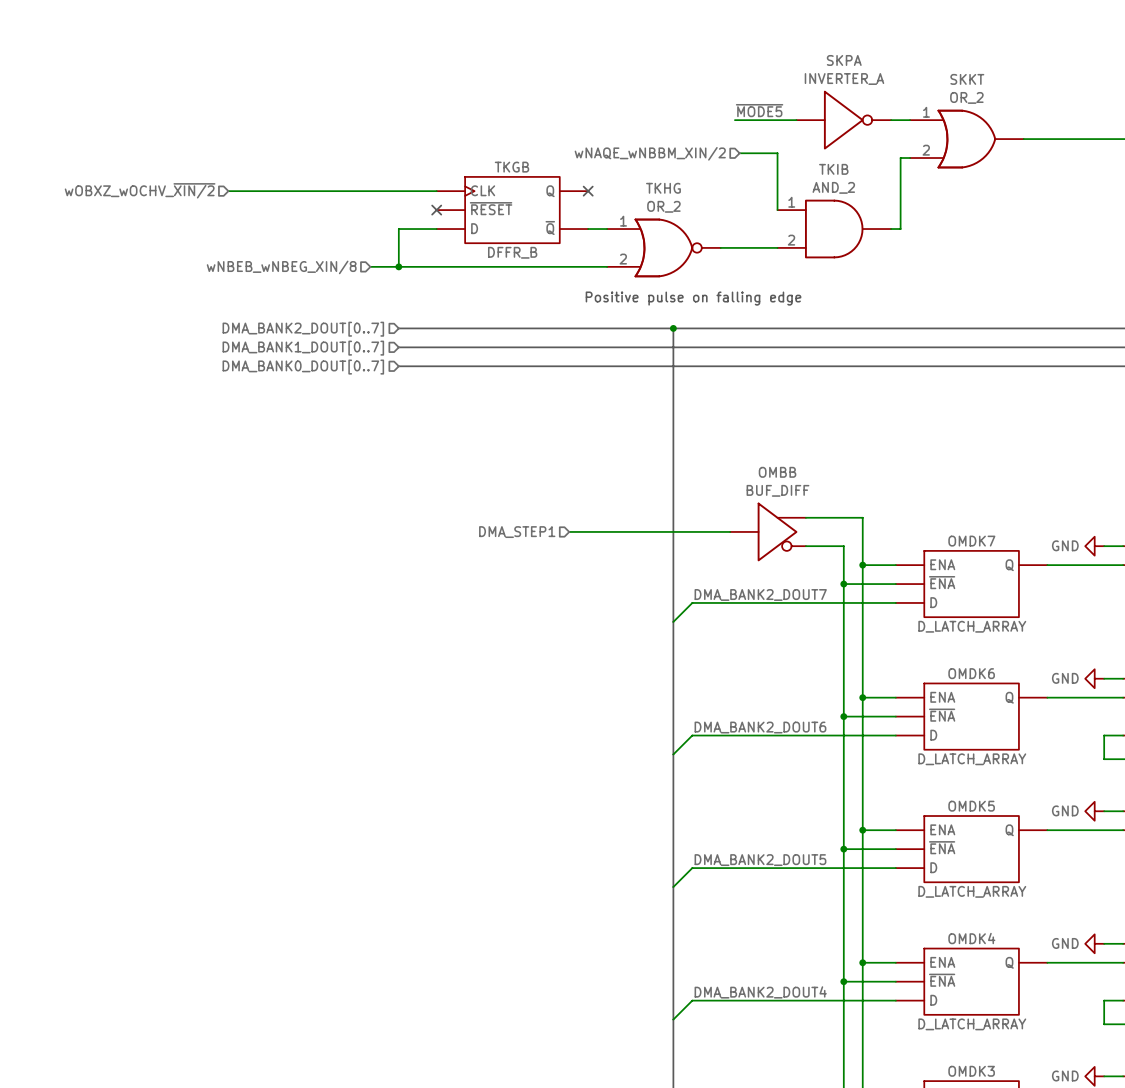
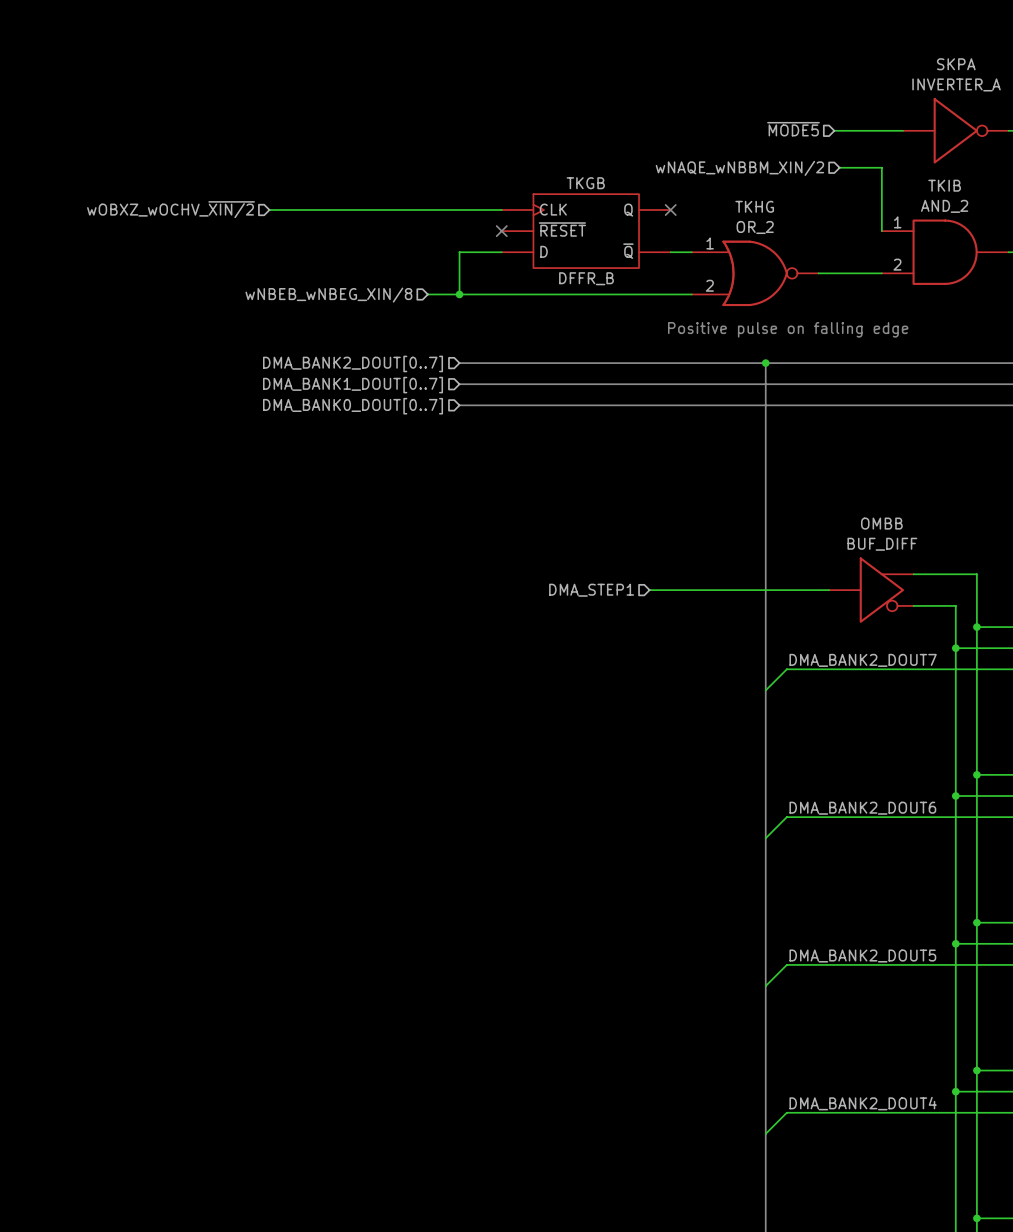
label: ~{MODE5} (759, 110) -> none
hierarchical label: none -> ~{MODE5} (793, 129)

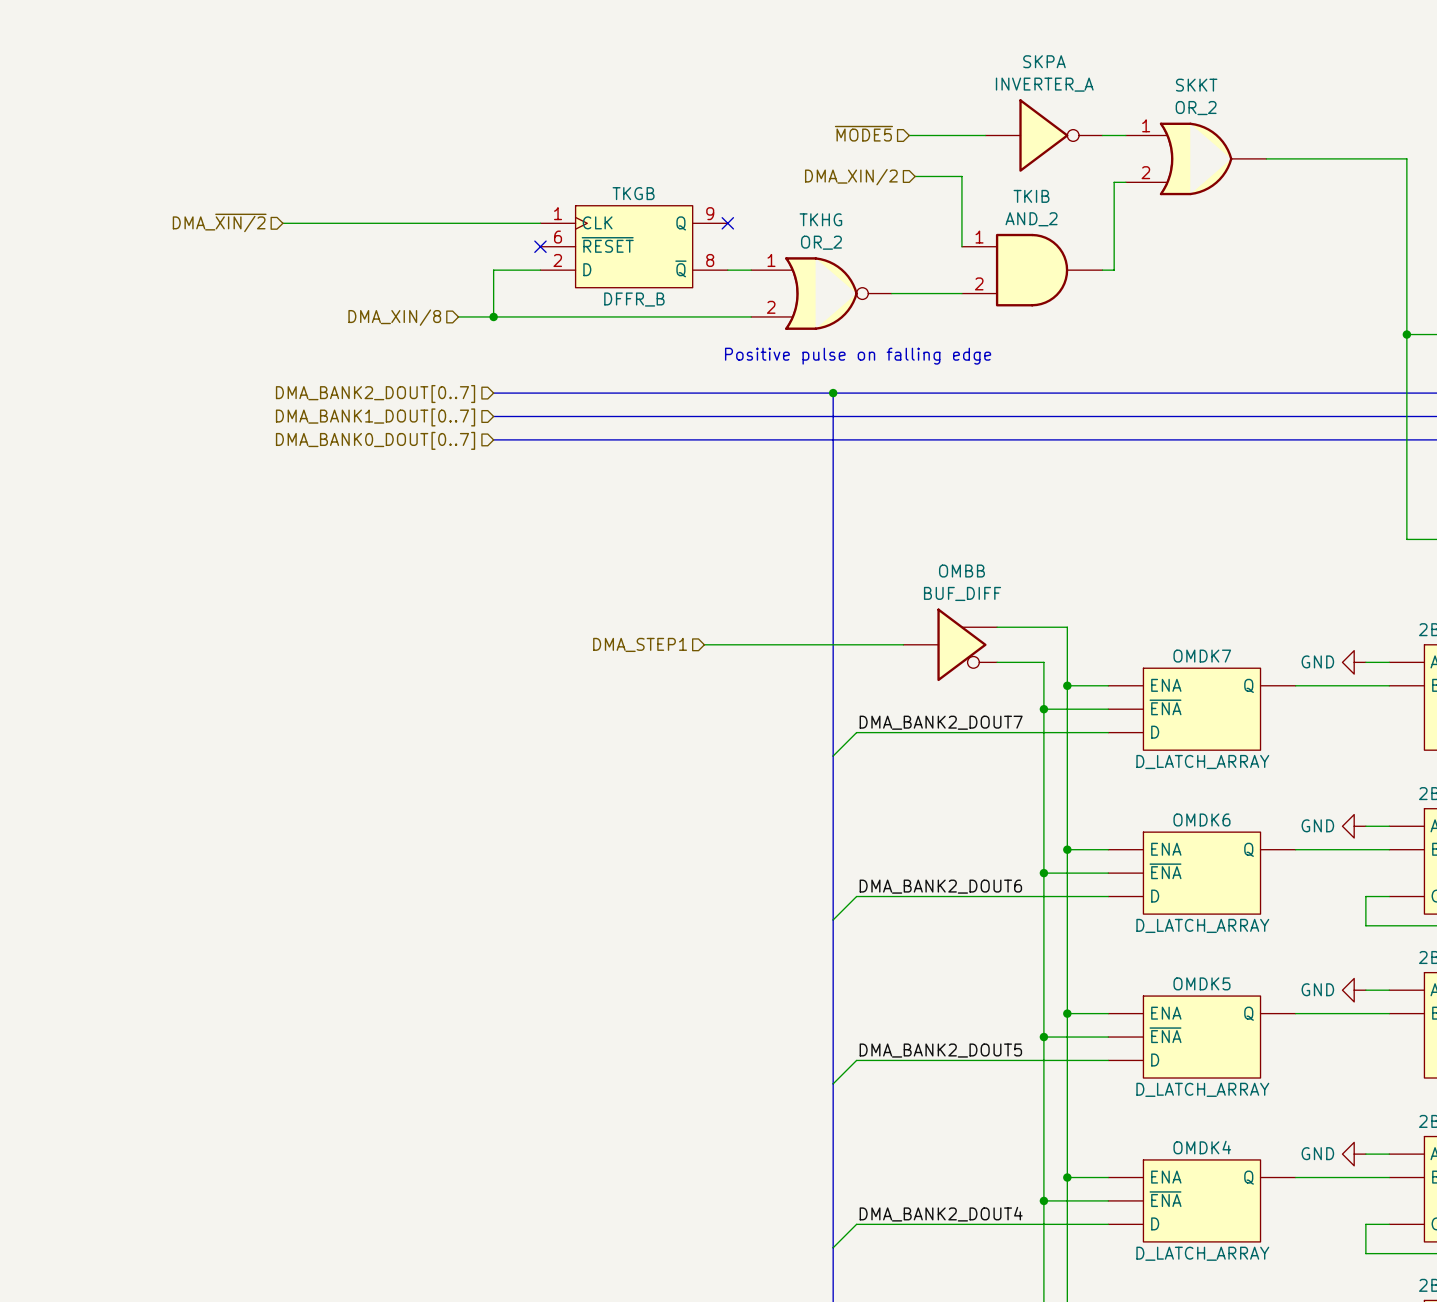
hierarchical label: wNAQE_wNBBM_XIN/2 (739, 168) -> DMA_XIN/2 (851, 177)
TKGB pin number: none -> 1 (558, 213)
TKGB pin number: none -> 9 (710, 213)
hierarchical label: wOBXZ_wOCHV_~{XIN/2} (170, 209) -> DMA_~{XIN/2} (219, 222)
TKGB pin number: none -> 6 (558, 237)
TKGB pin number: none -> 2 (557, 260)
TKGB pin number: none -> 8 (710, 260)
hierarchical label: wNBEB_wNBEG_XIN/8 (328, 295) -> DMA_XIN/8 (394, 317)

